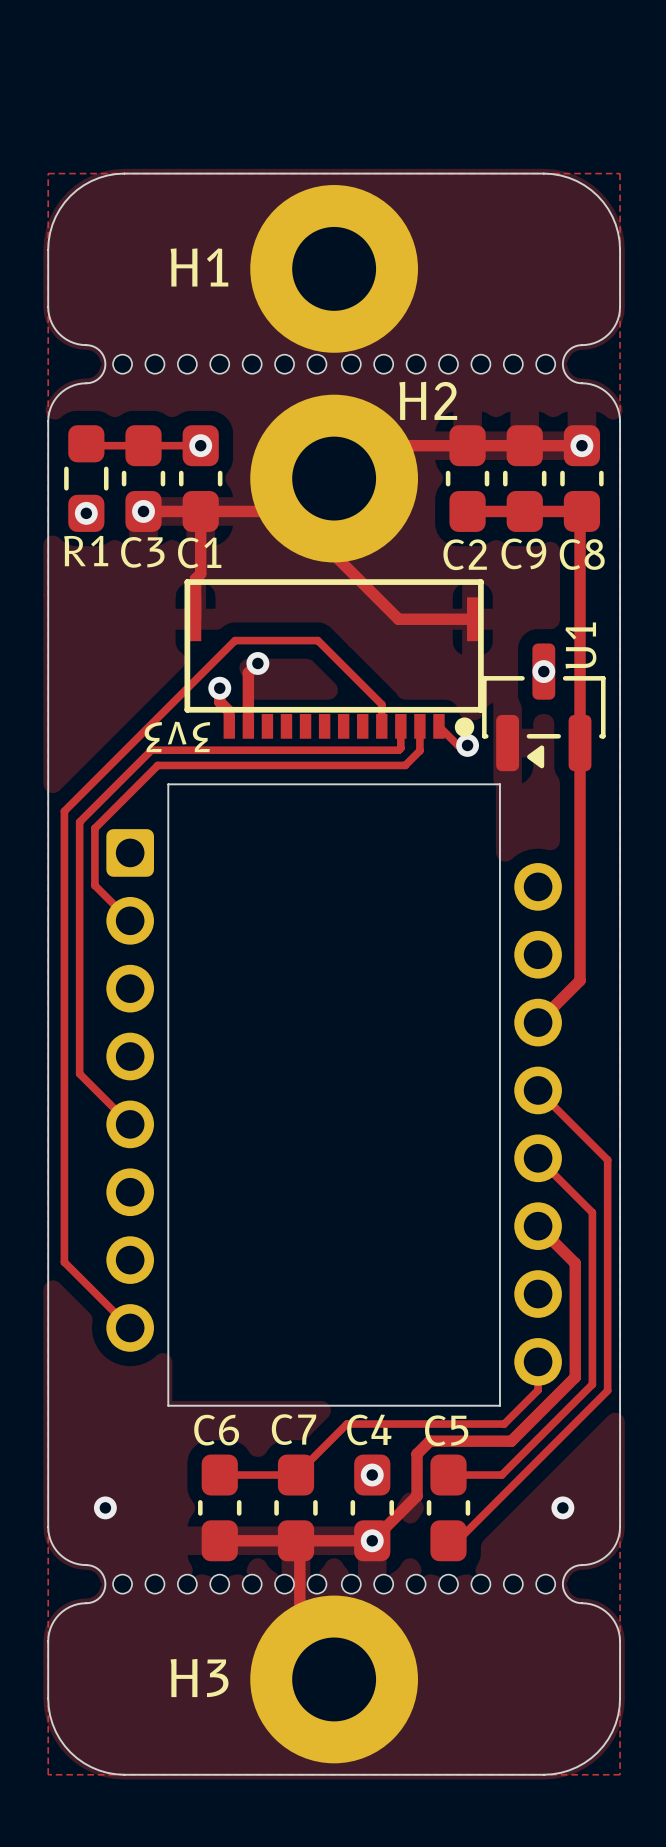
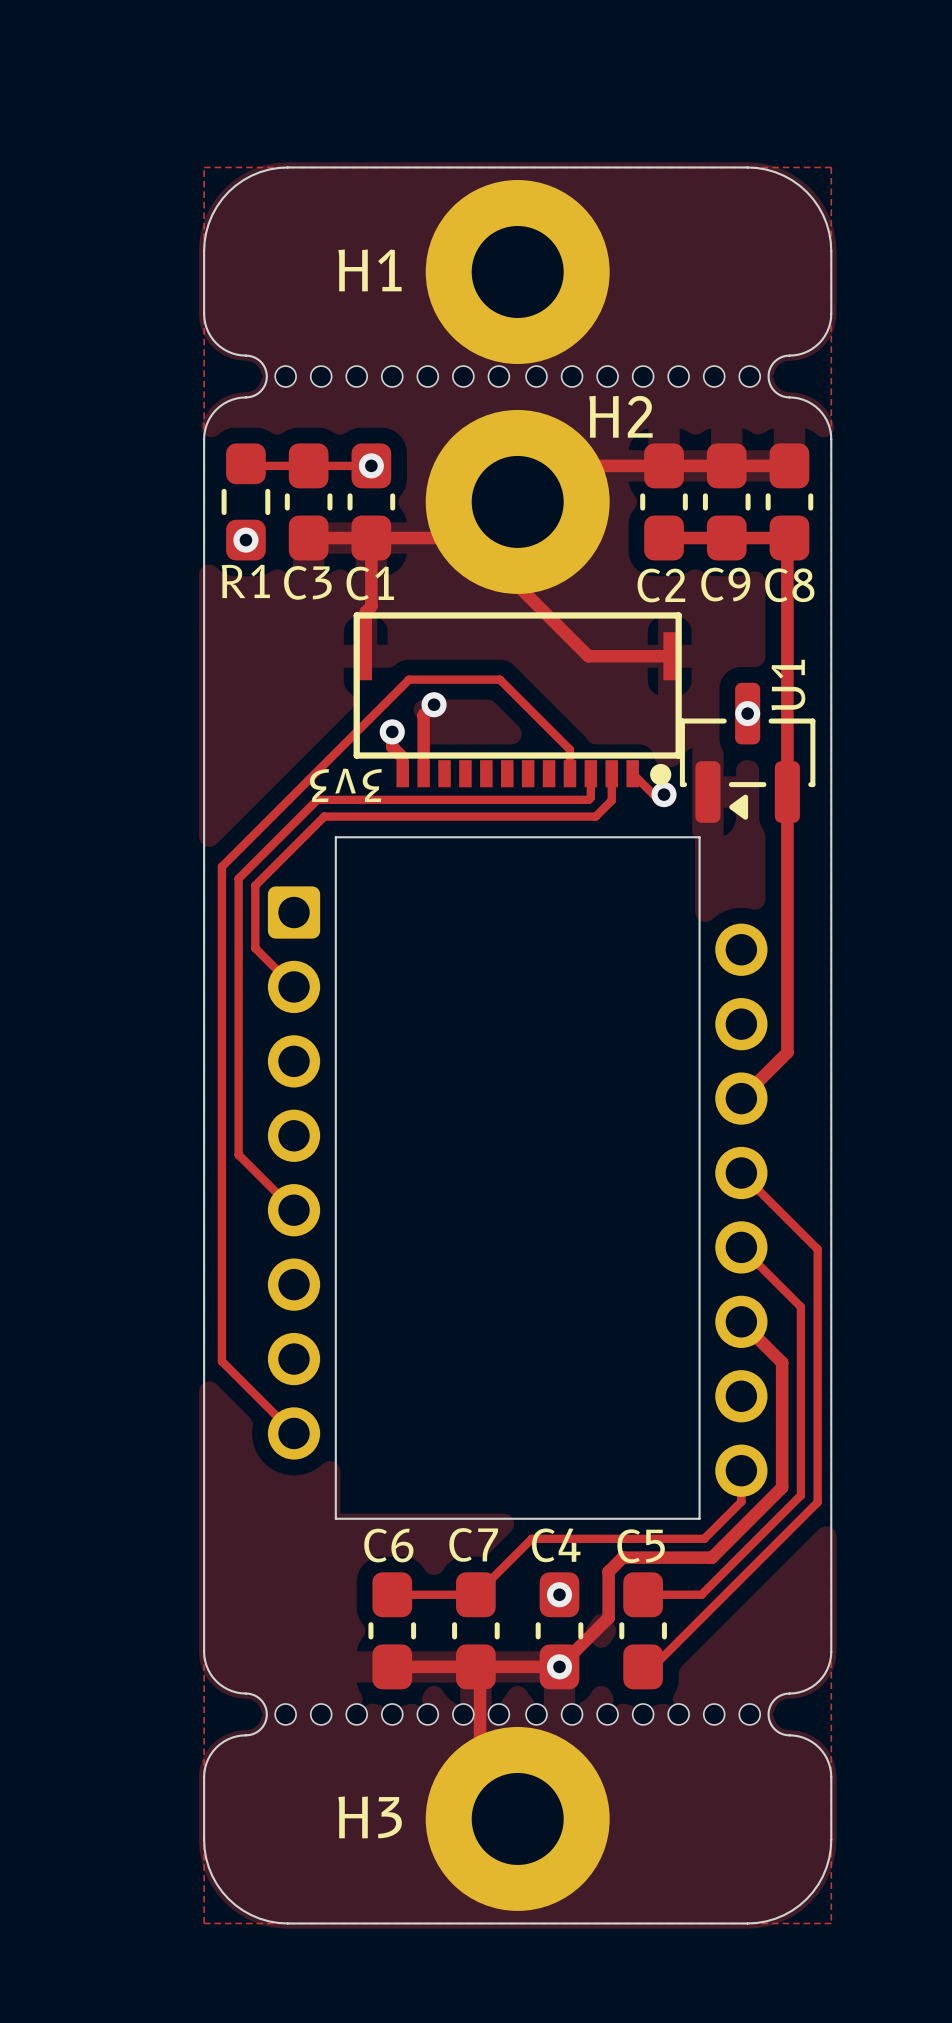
via: (581, 445) -> none
via: (143, 511) -> none
via: (105, 1507) -> none
via: (562, 1507) -> none

